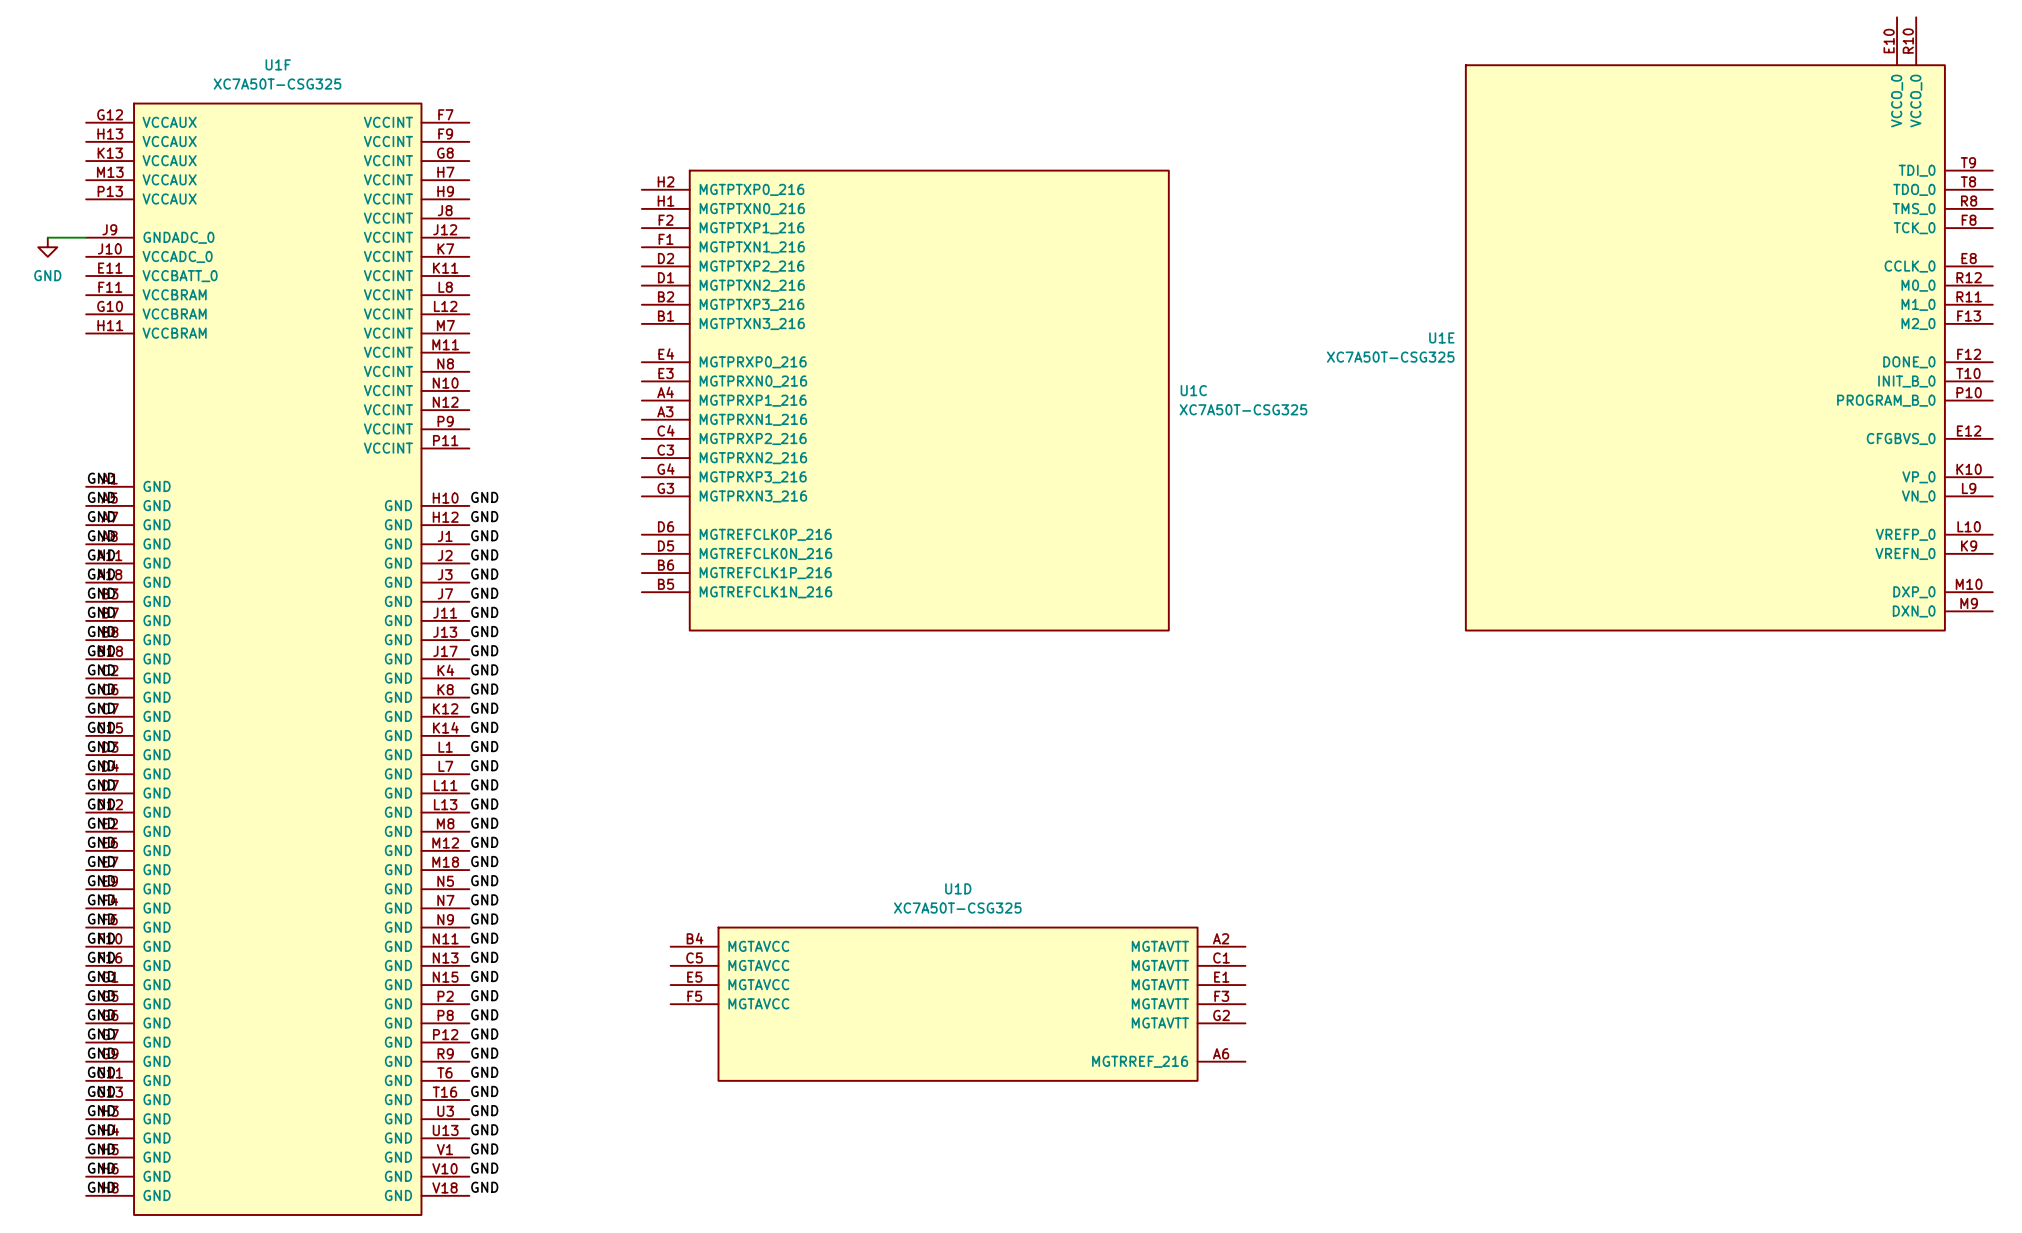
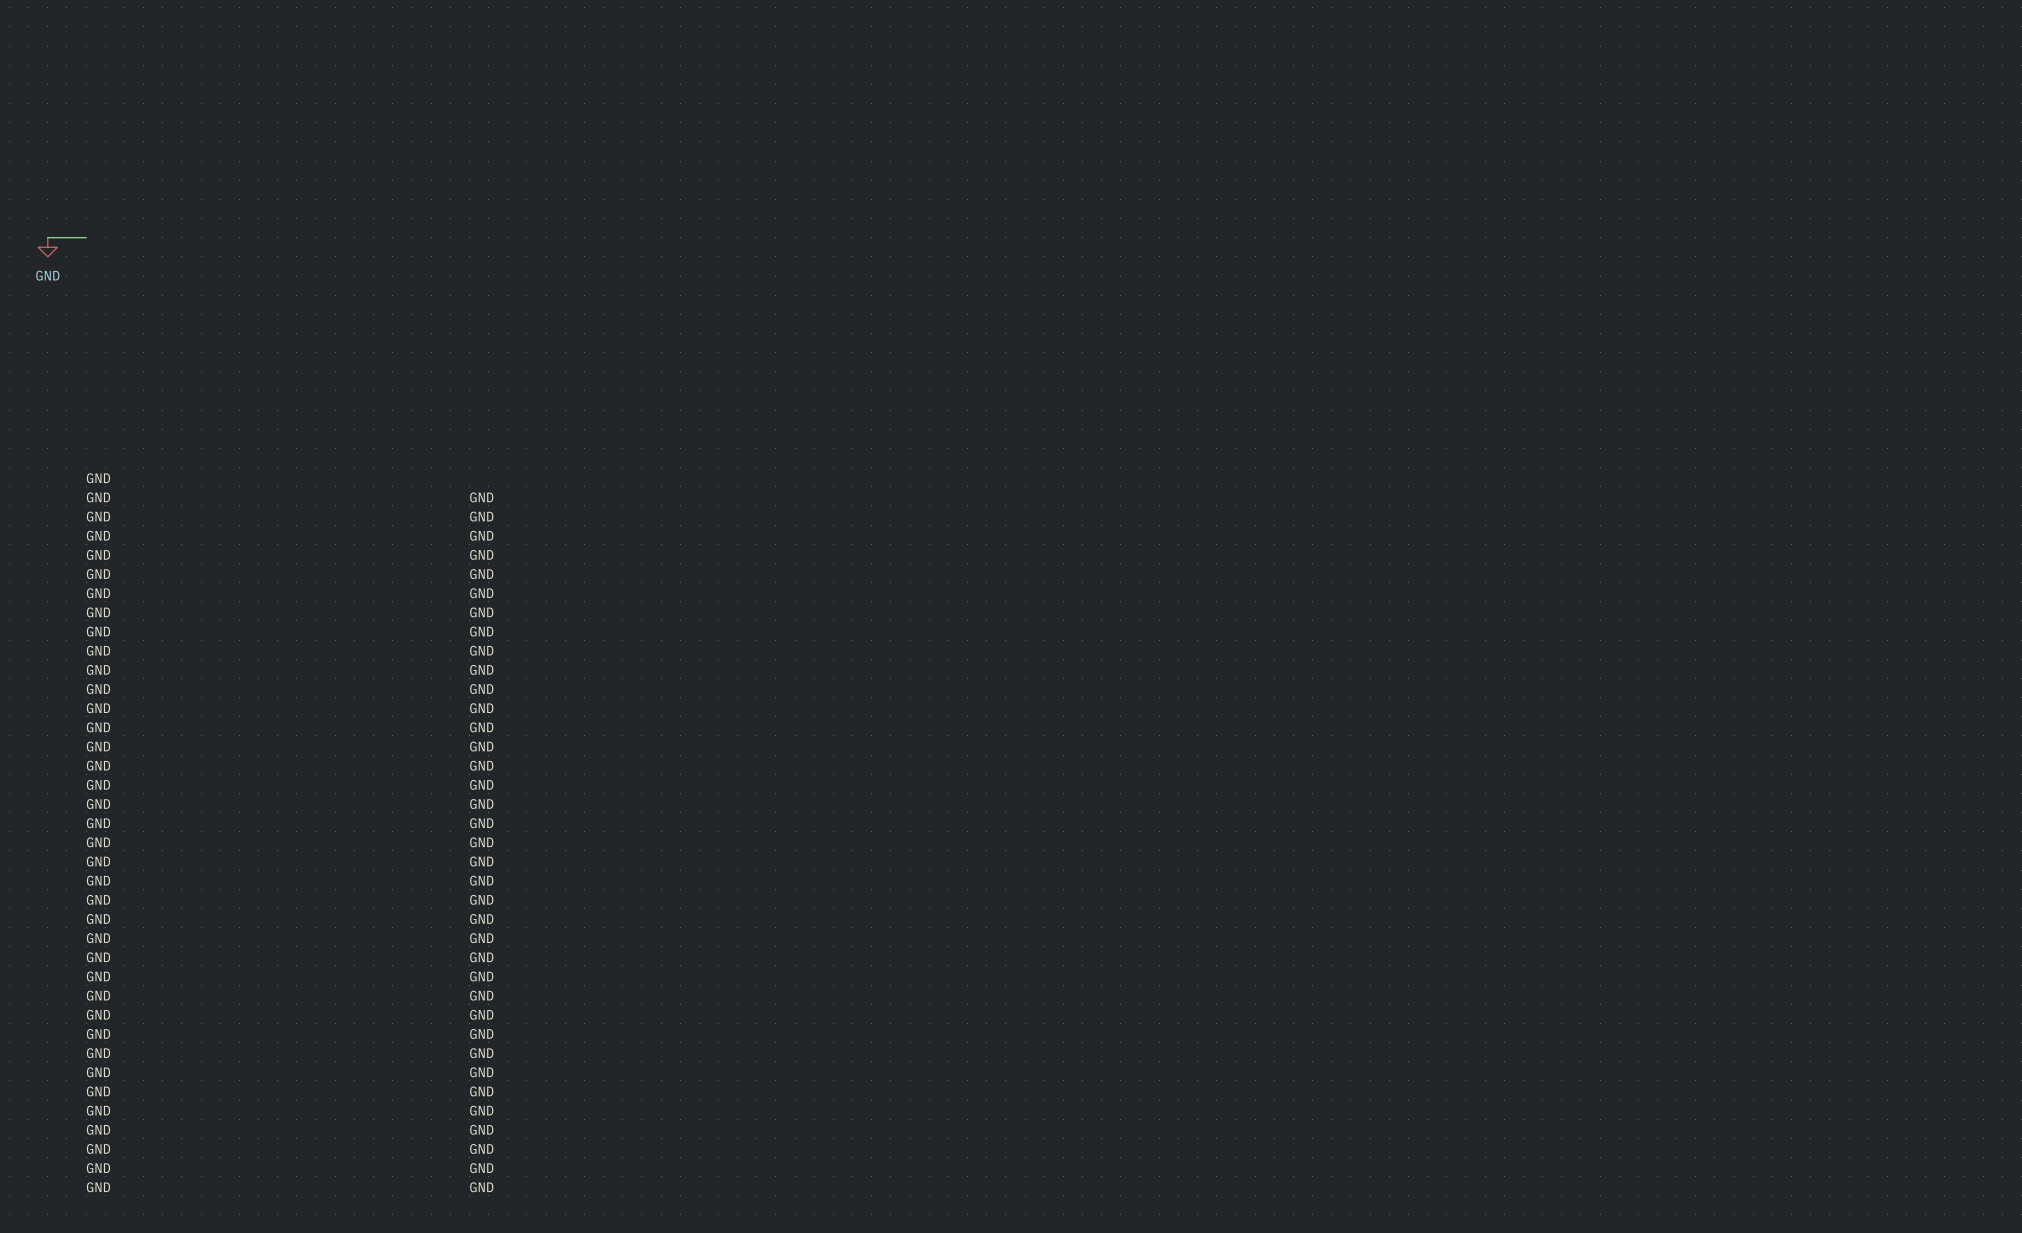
U1E: XC7A50T-CSG325 (1728, 324) -> none
U1C: XC7A50T-CSG325 (905, 400) -> none
U1F: XC7A50T-CSG325 (277, 659) -> none
U1D: XC7A50T-CSG325 (958, 1004) -> none

